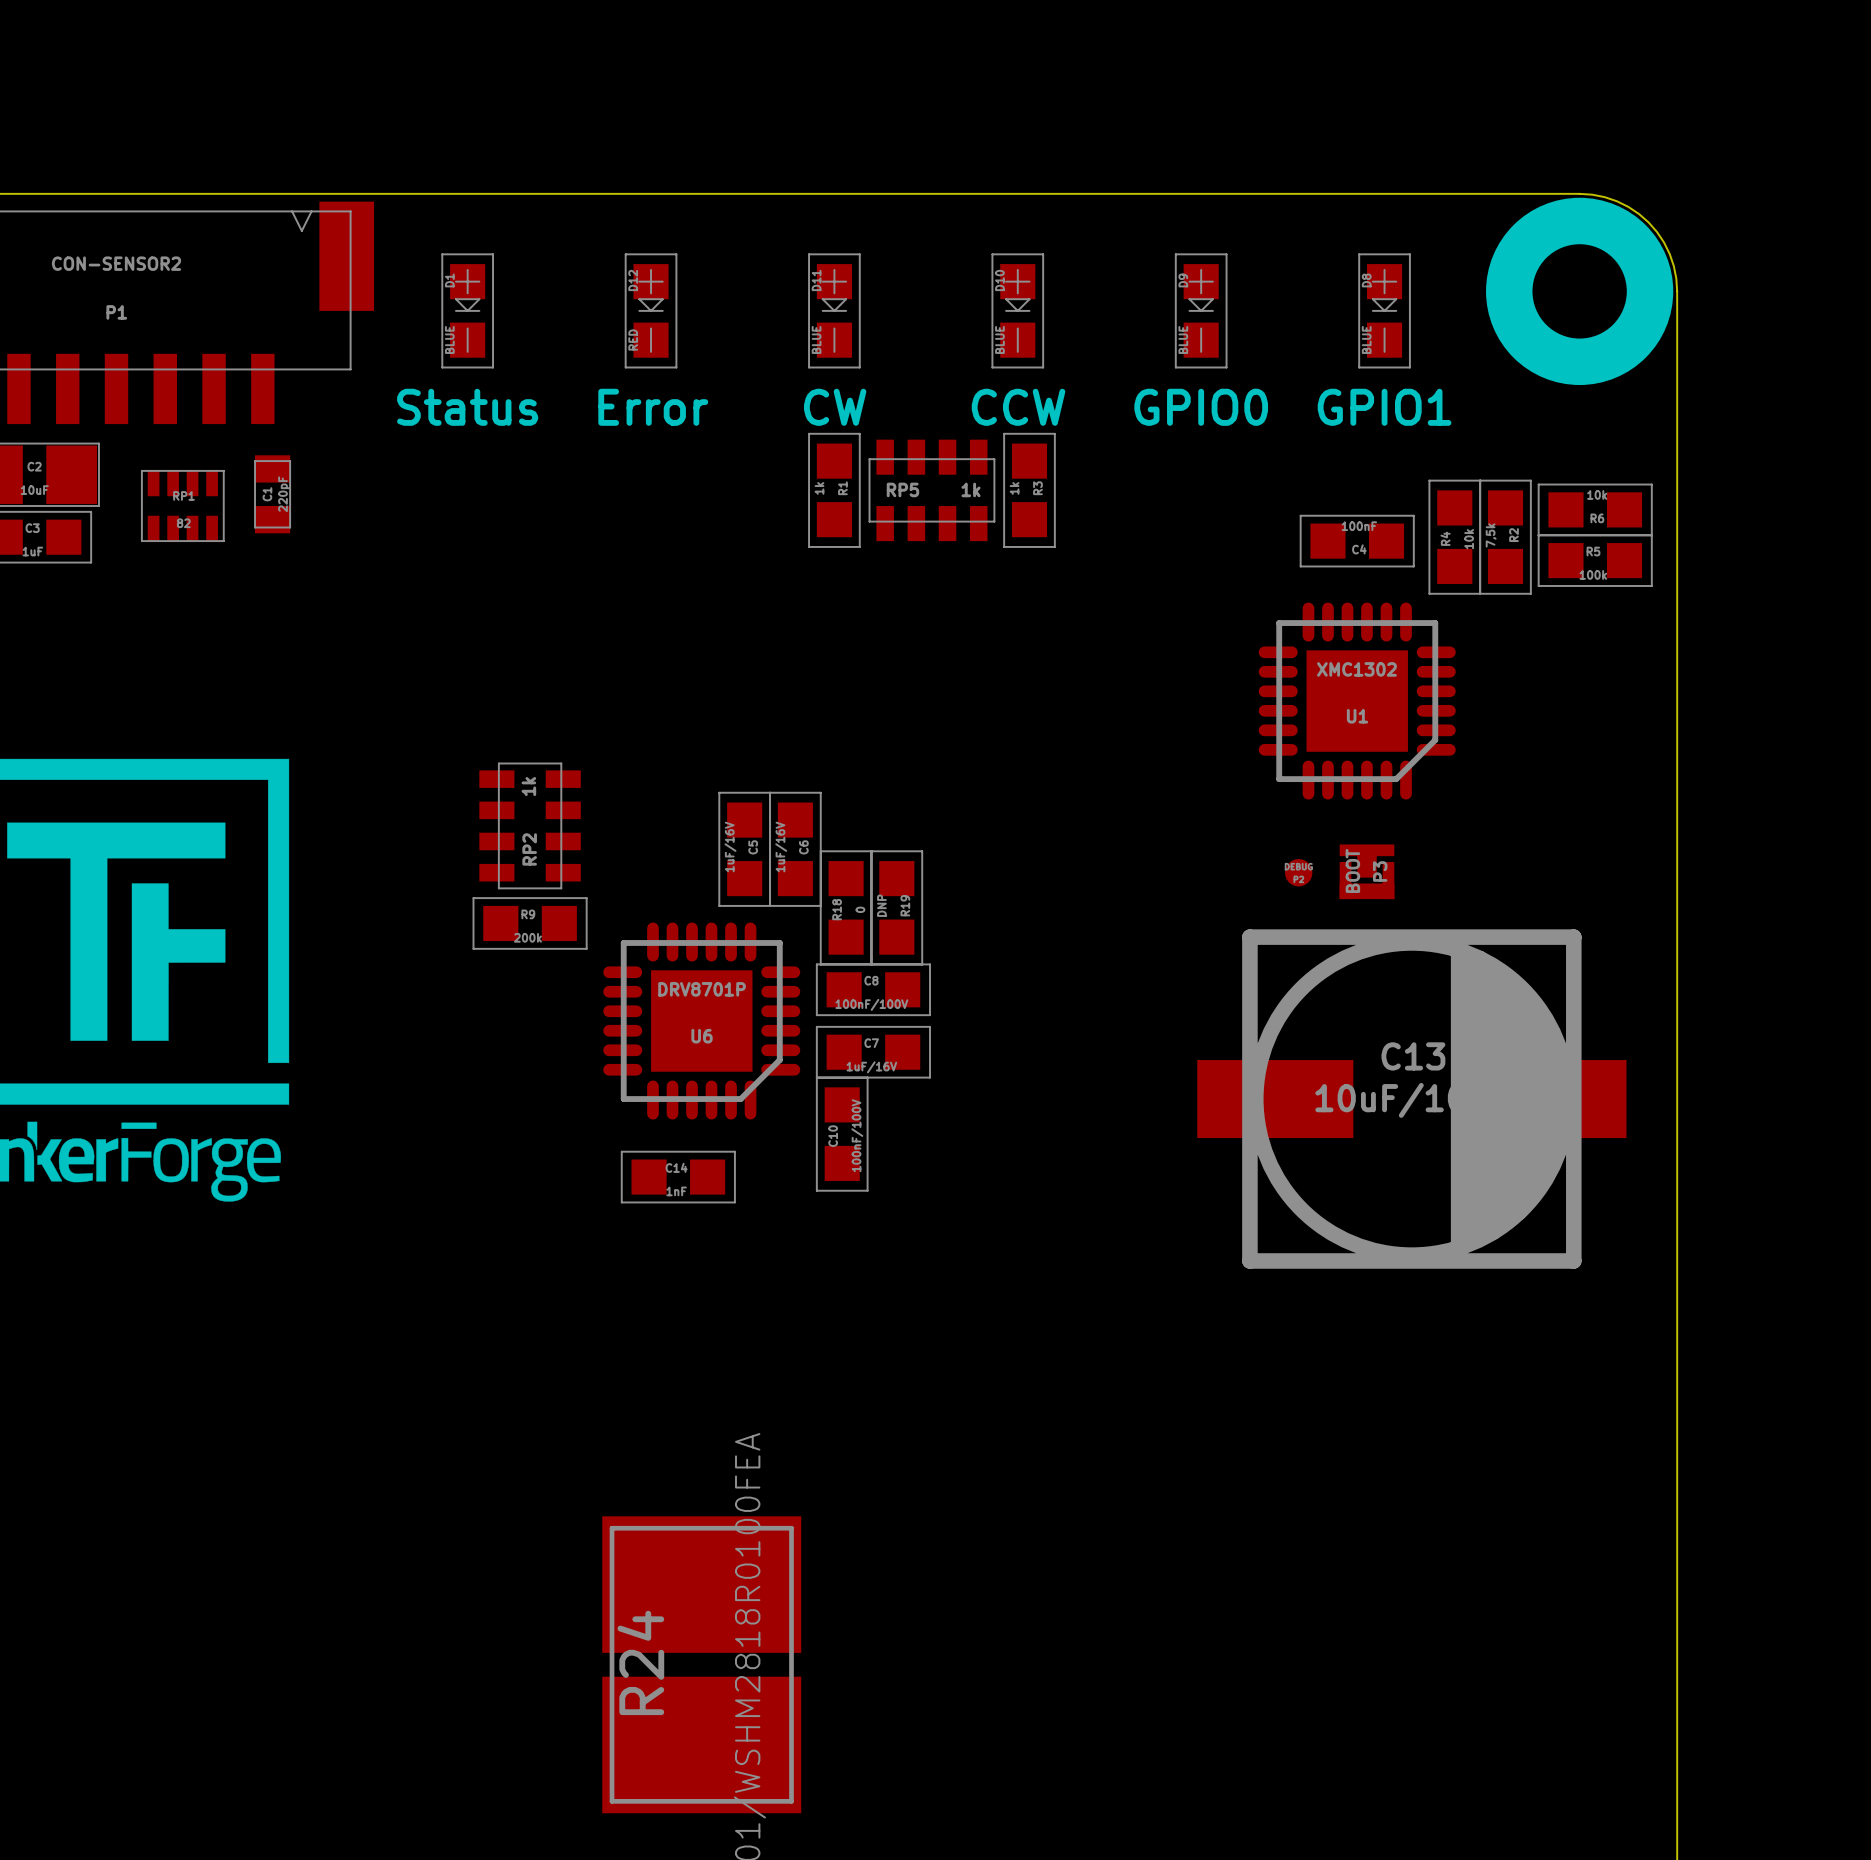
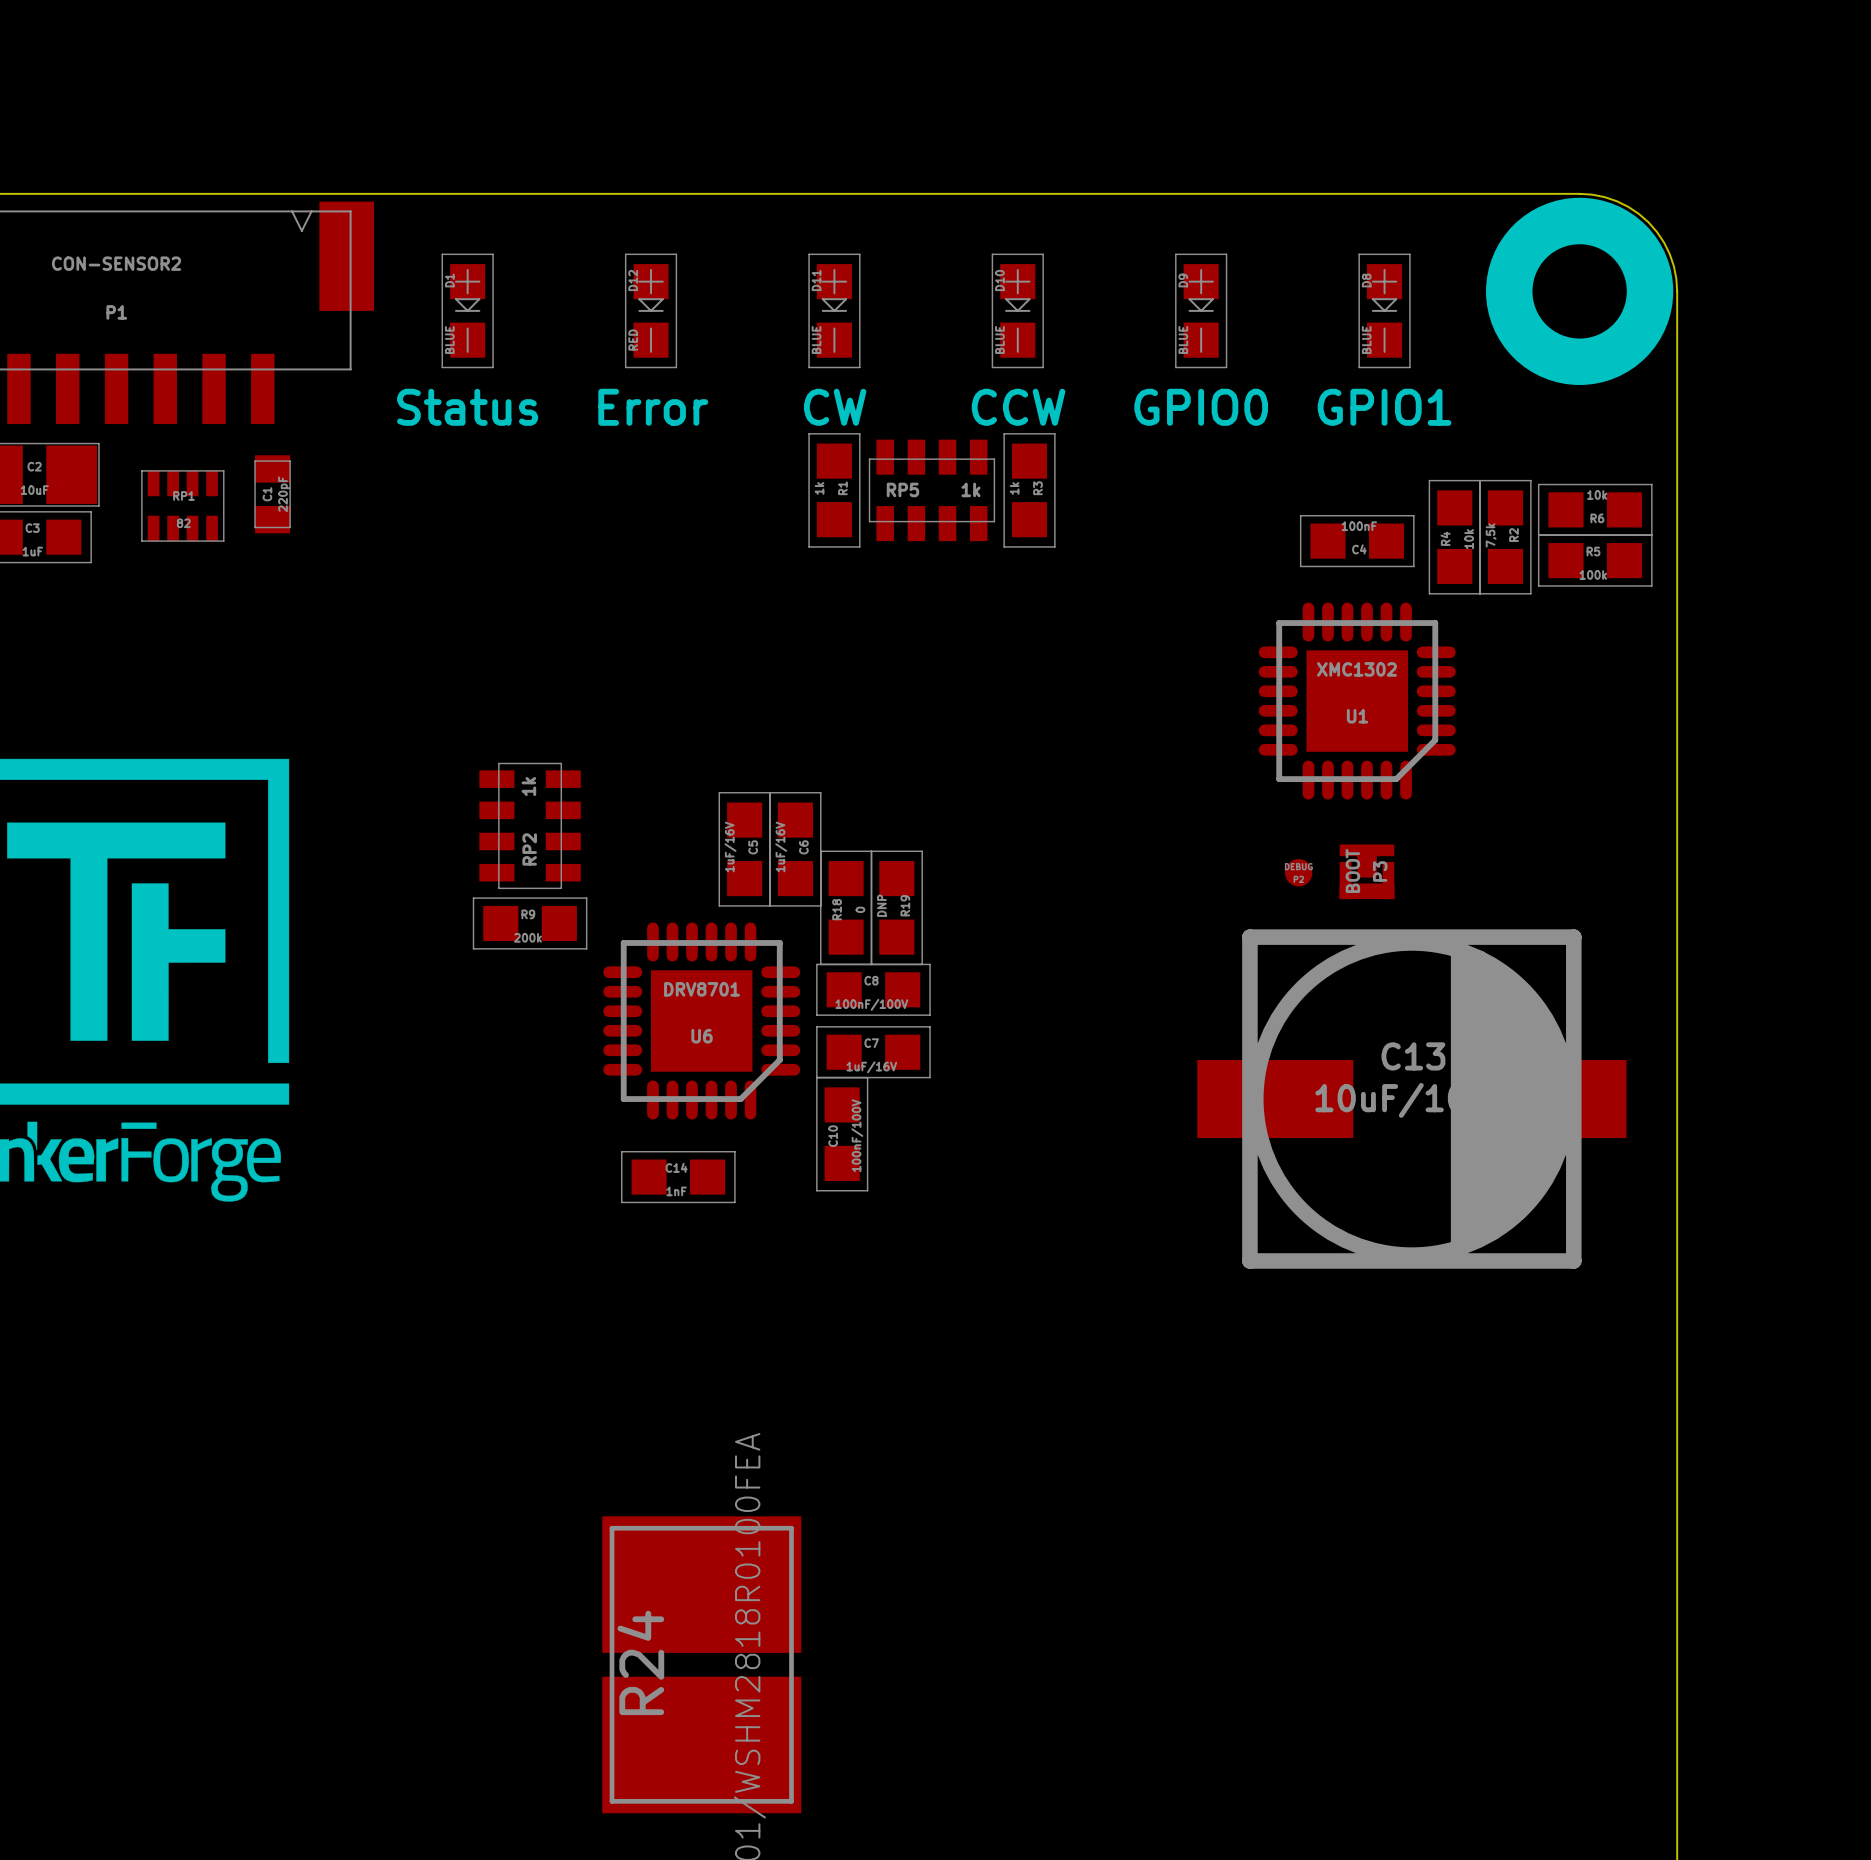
U6 value: DRV8701P (702, 989) -> DRV8701 (702, 989)

